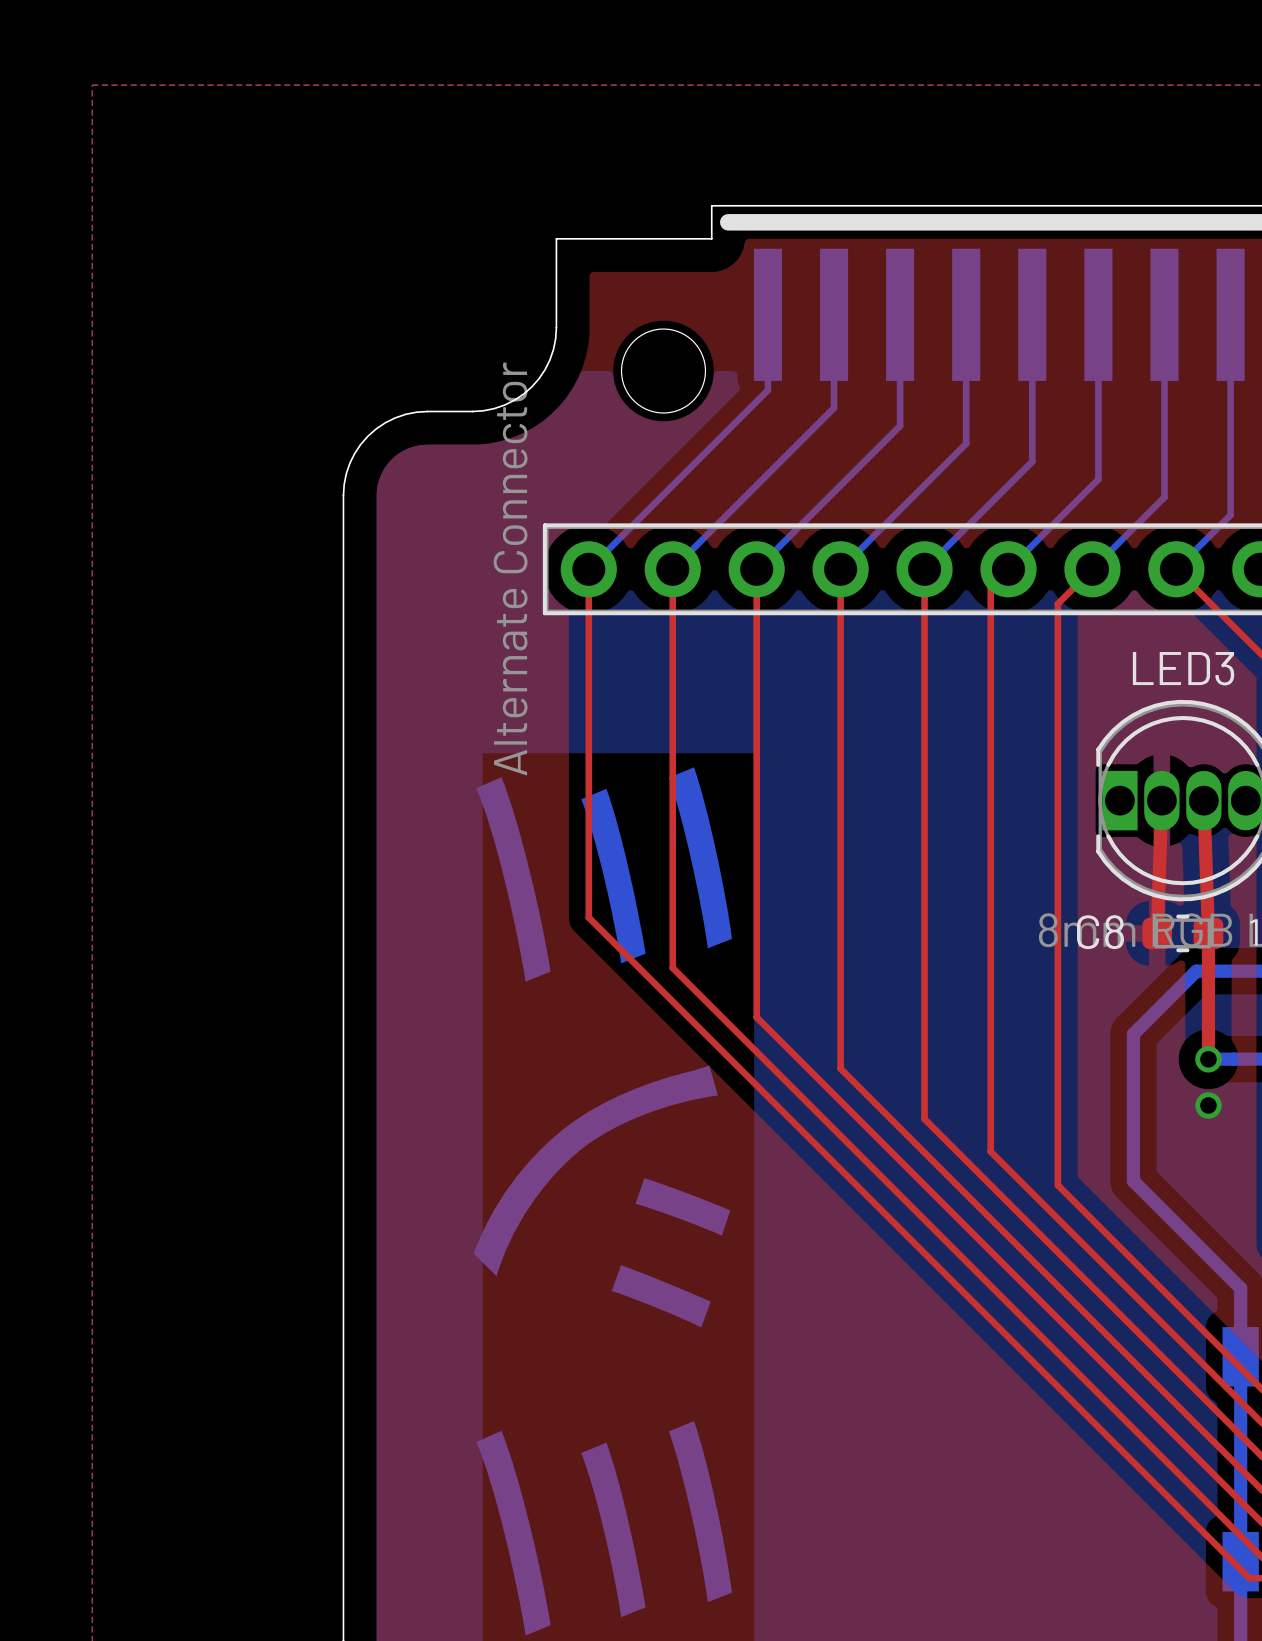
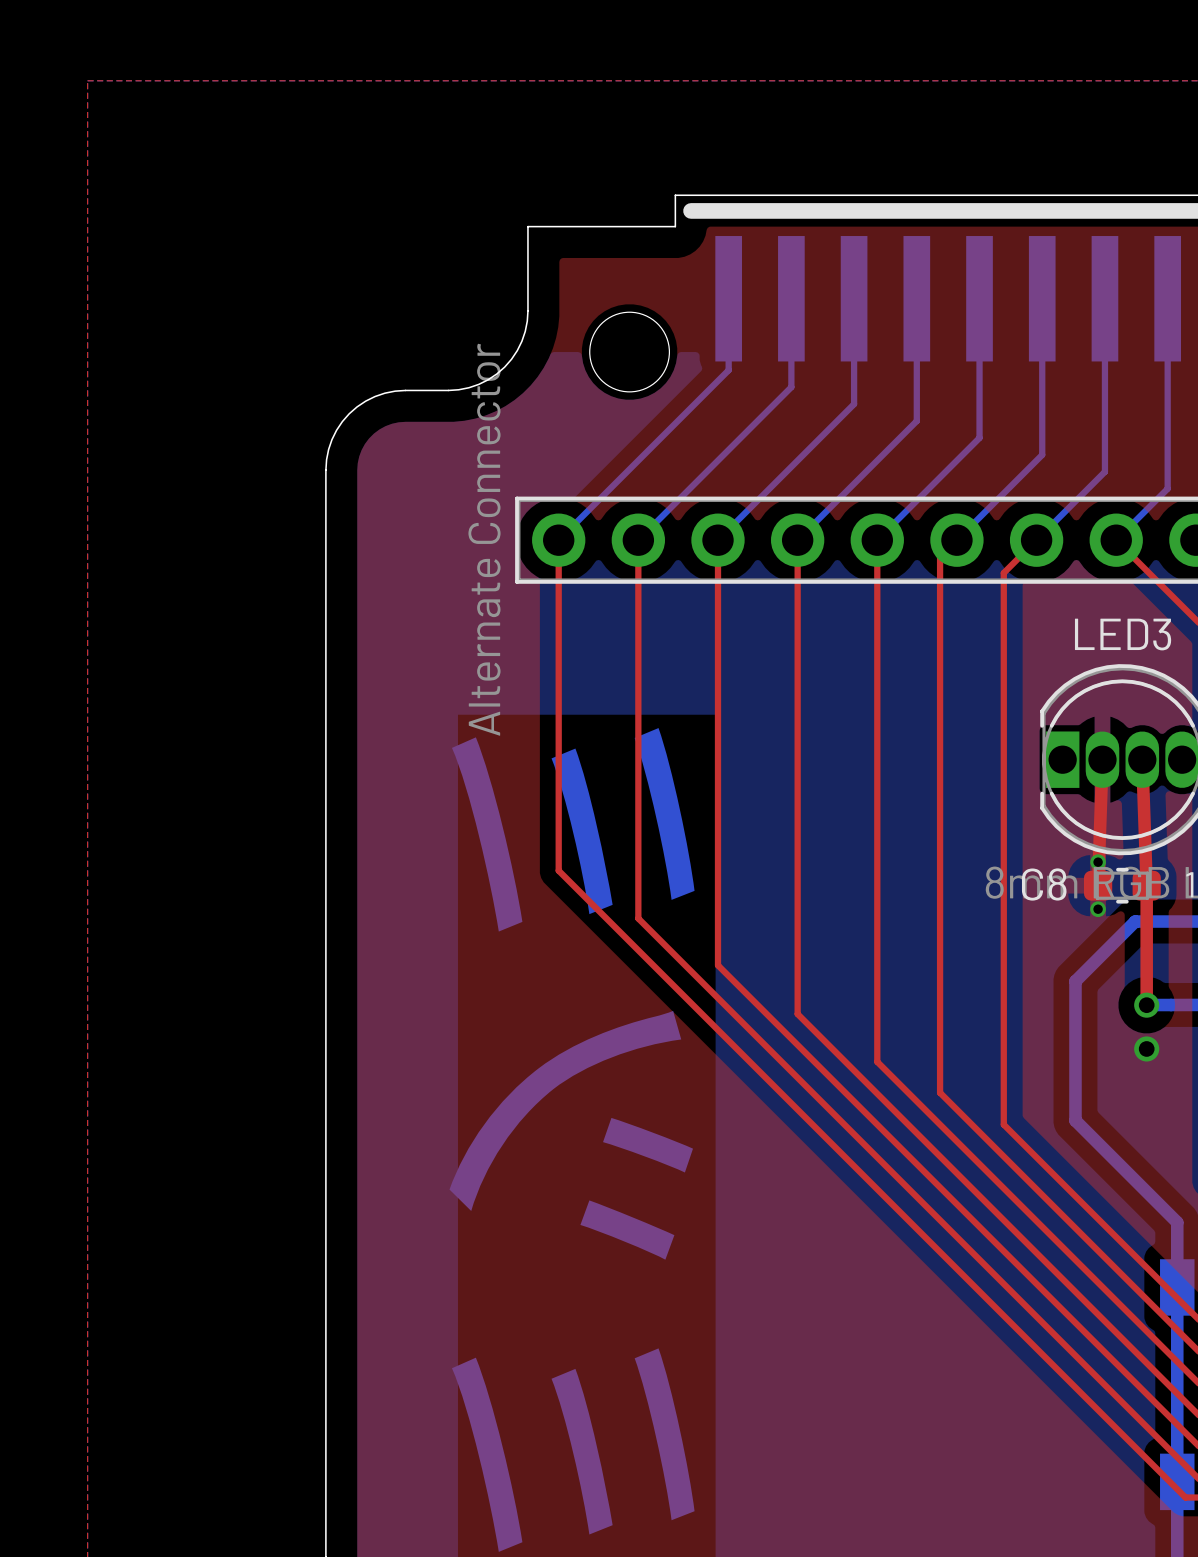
via: none -> (1098, 862)
via: none -> (1098, 909)

